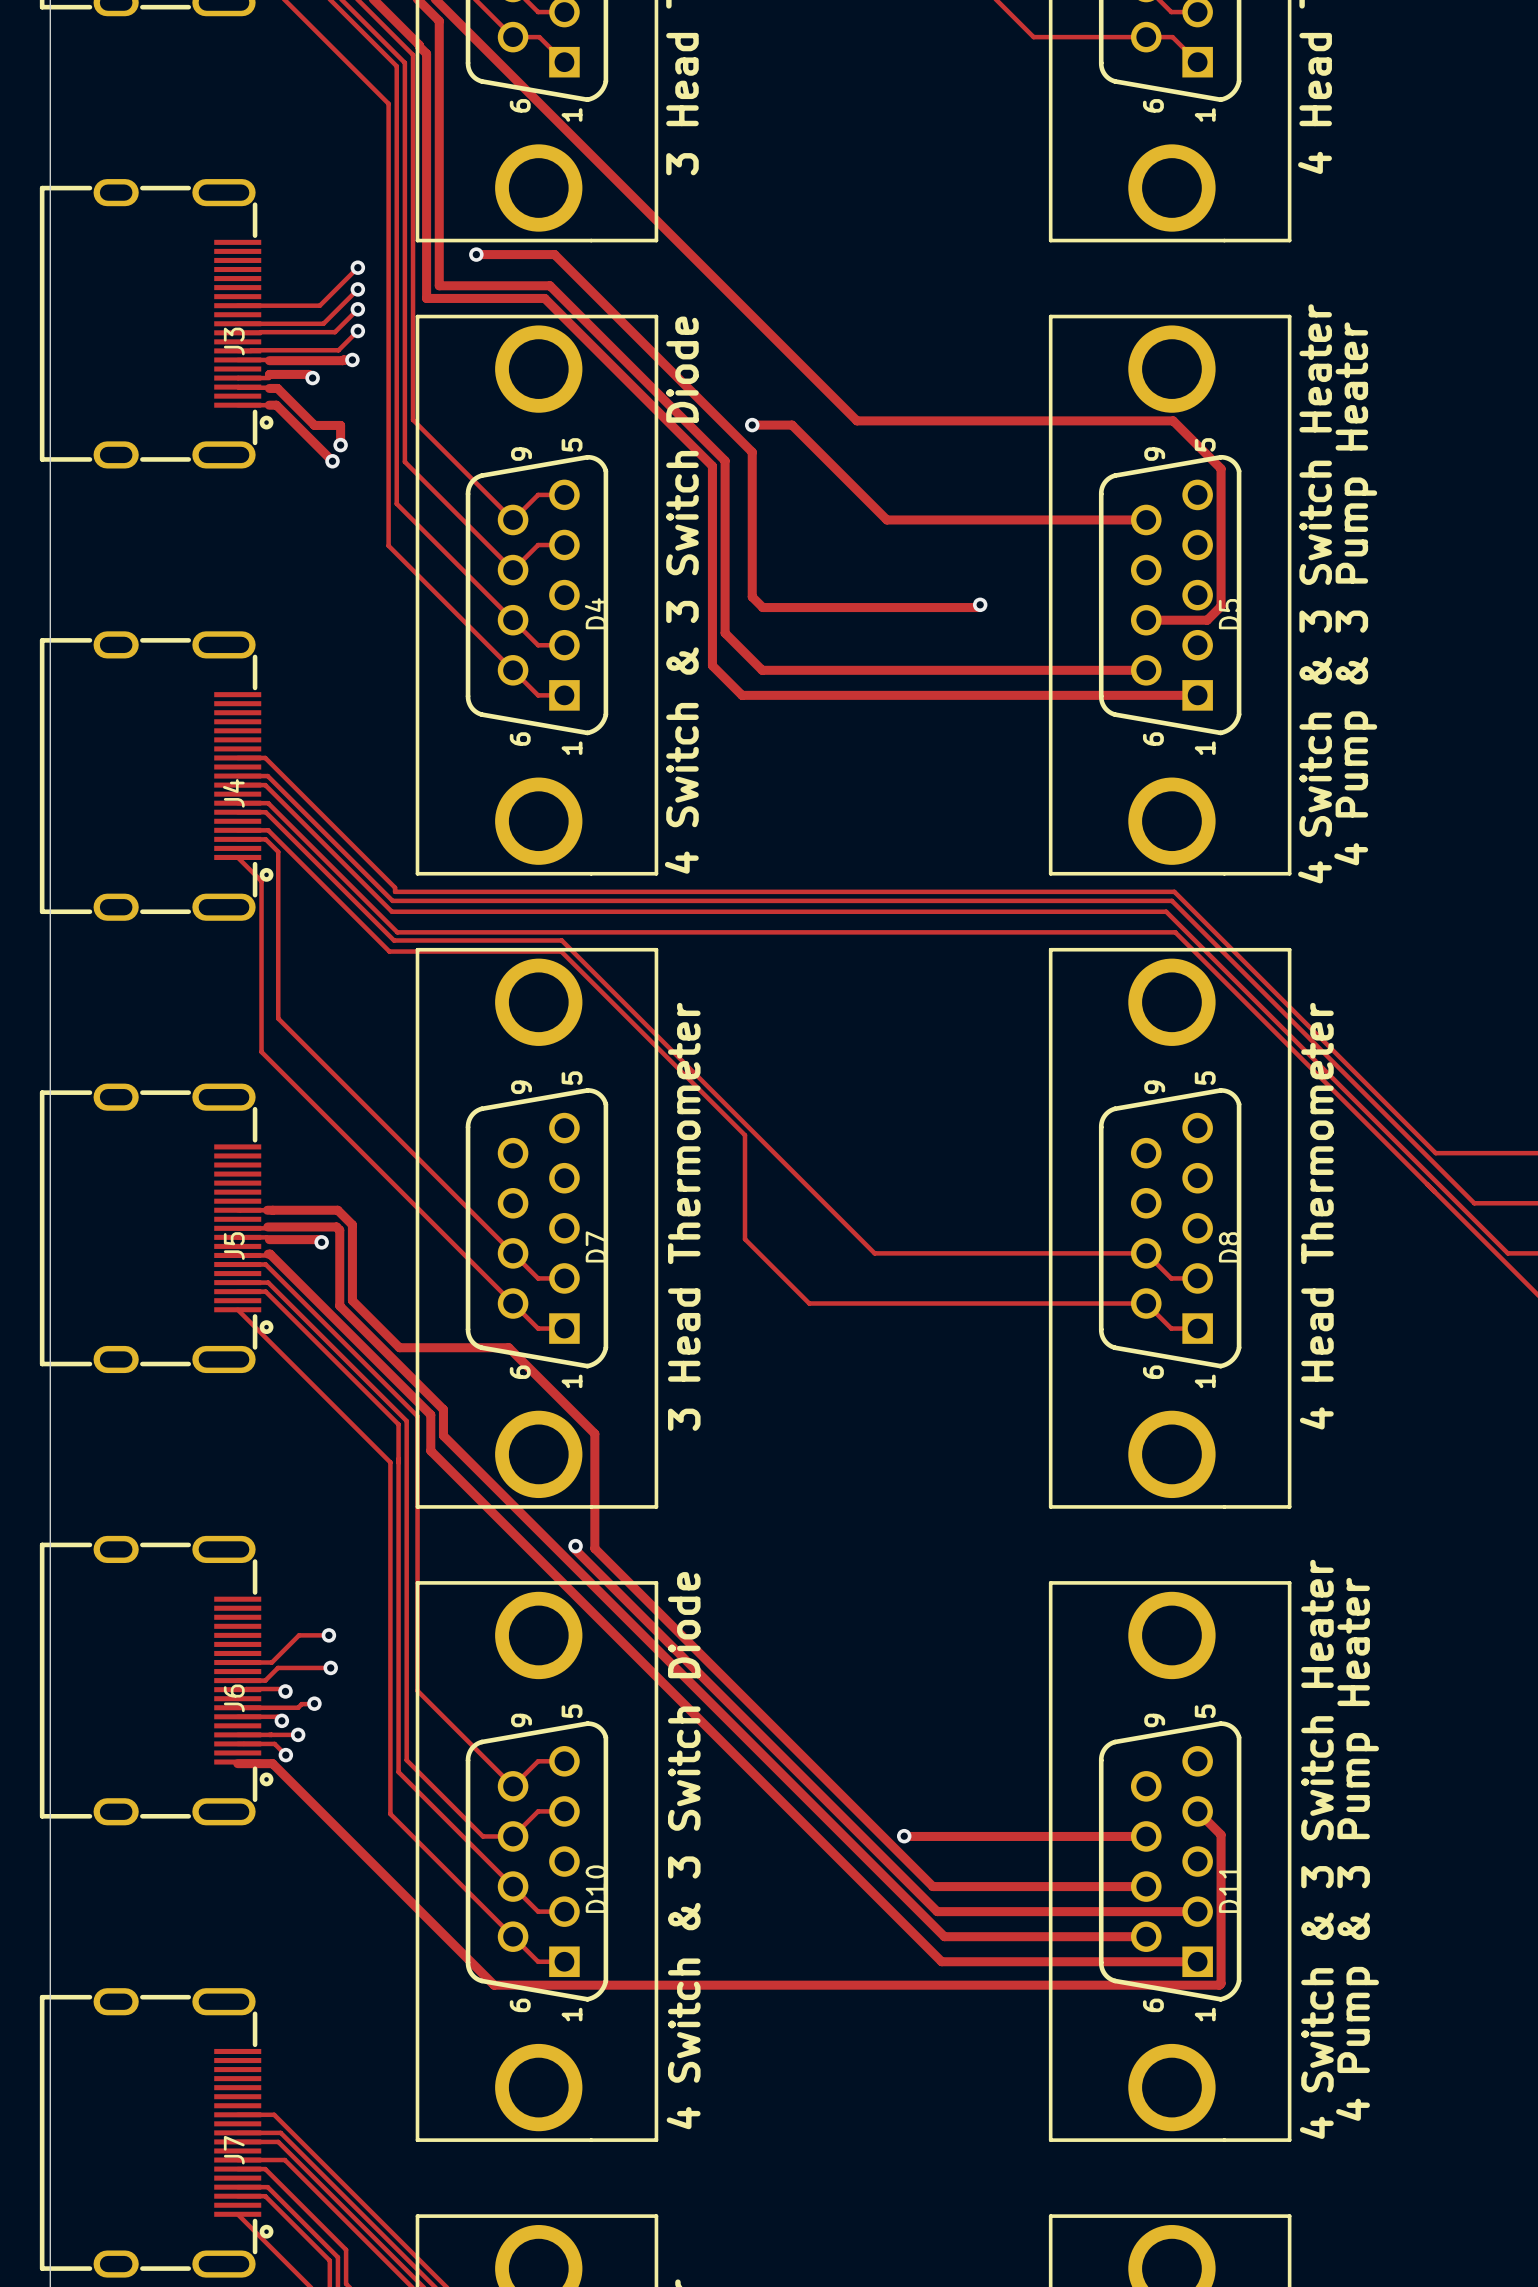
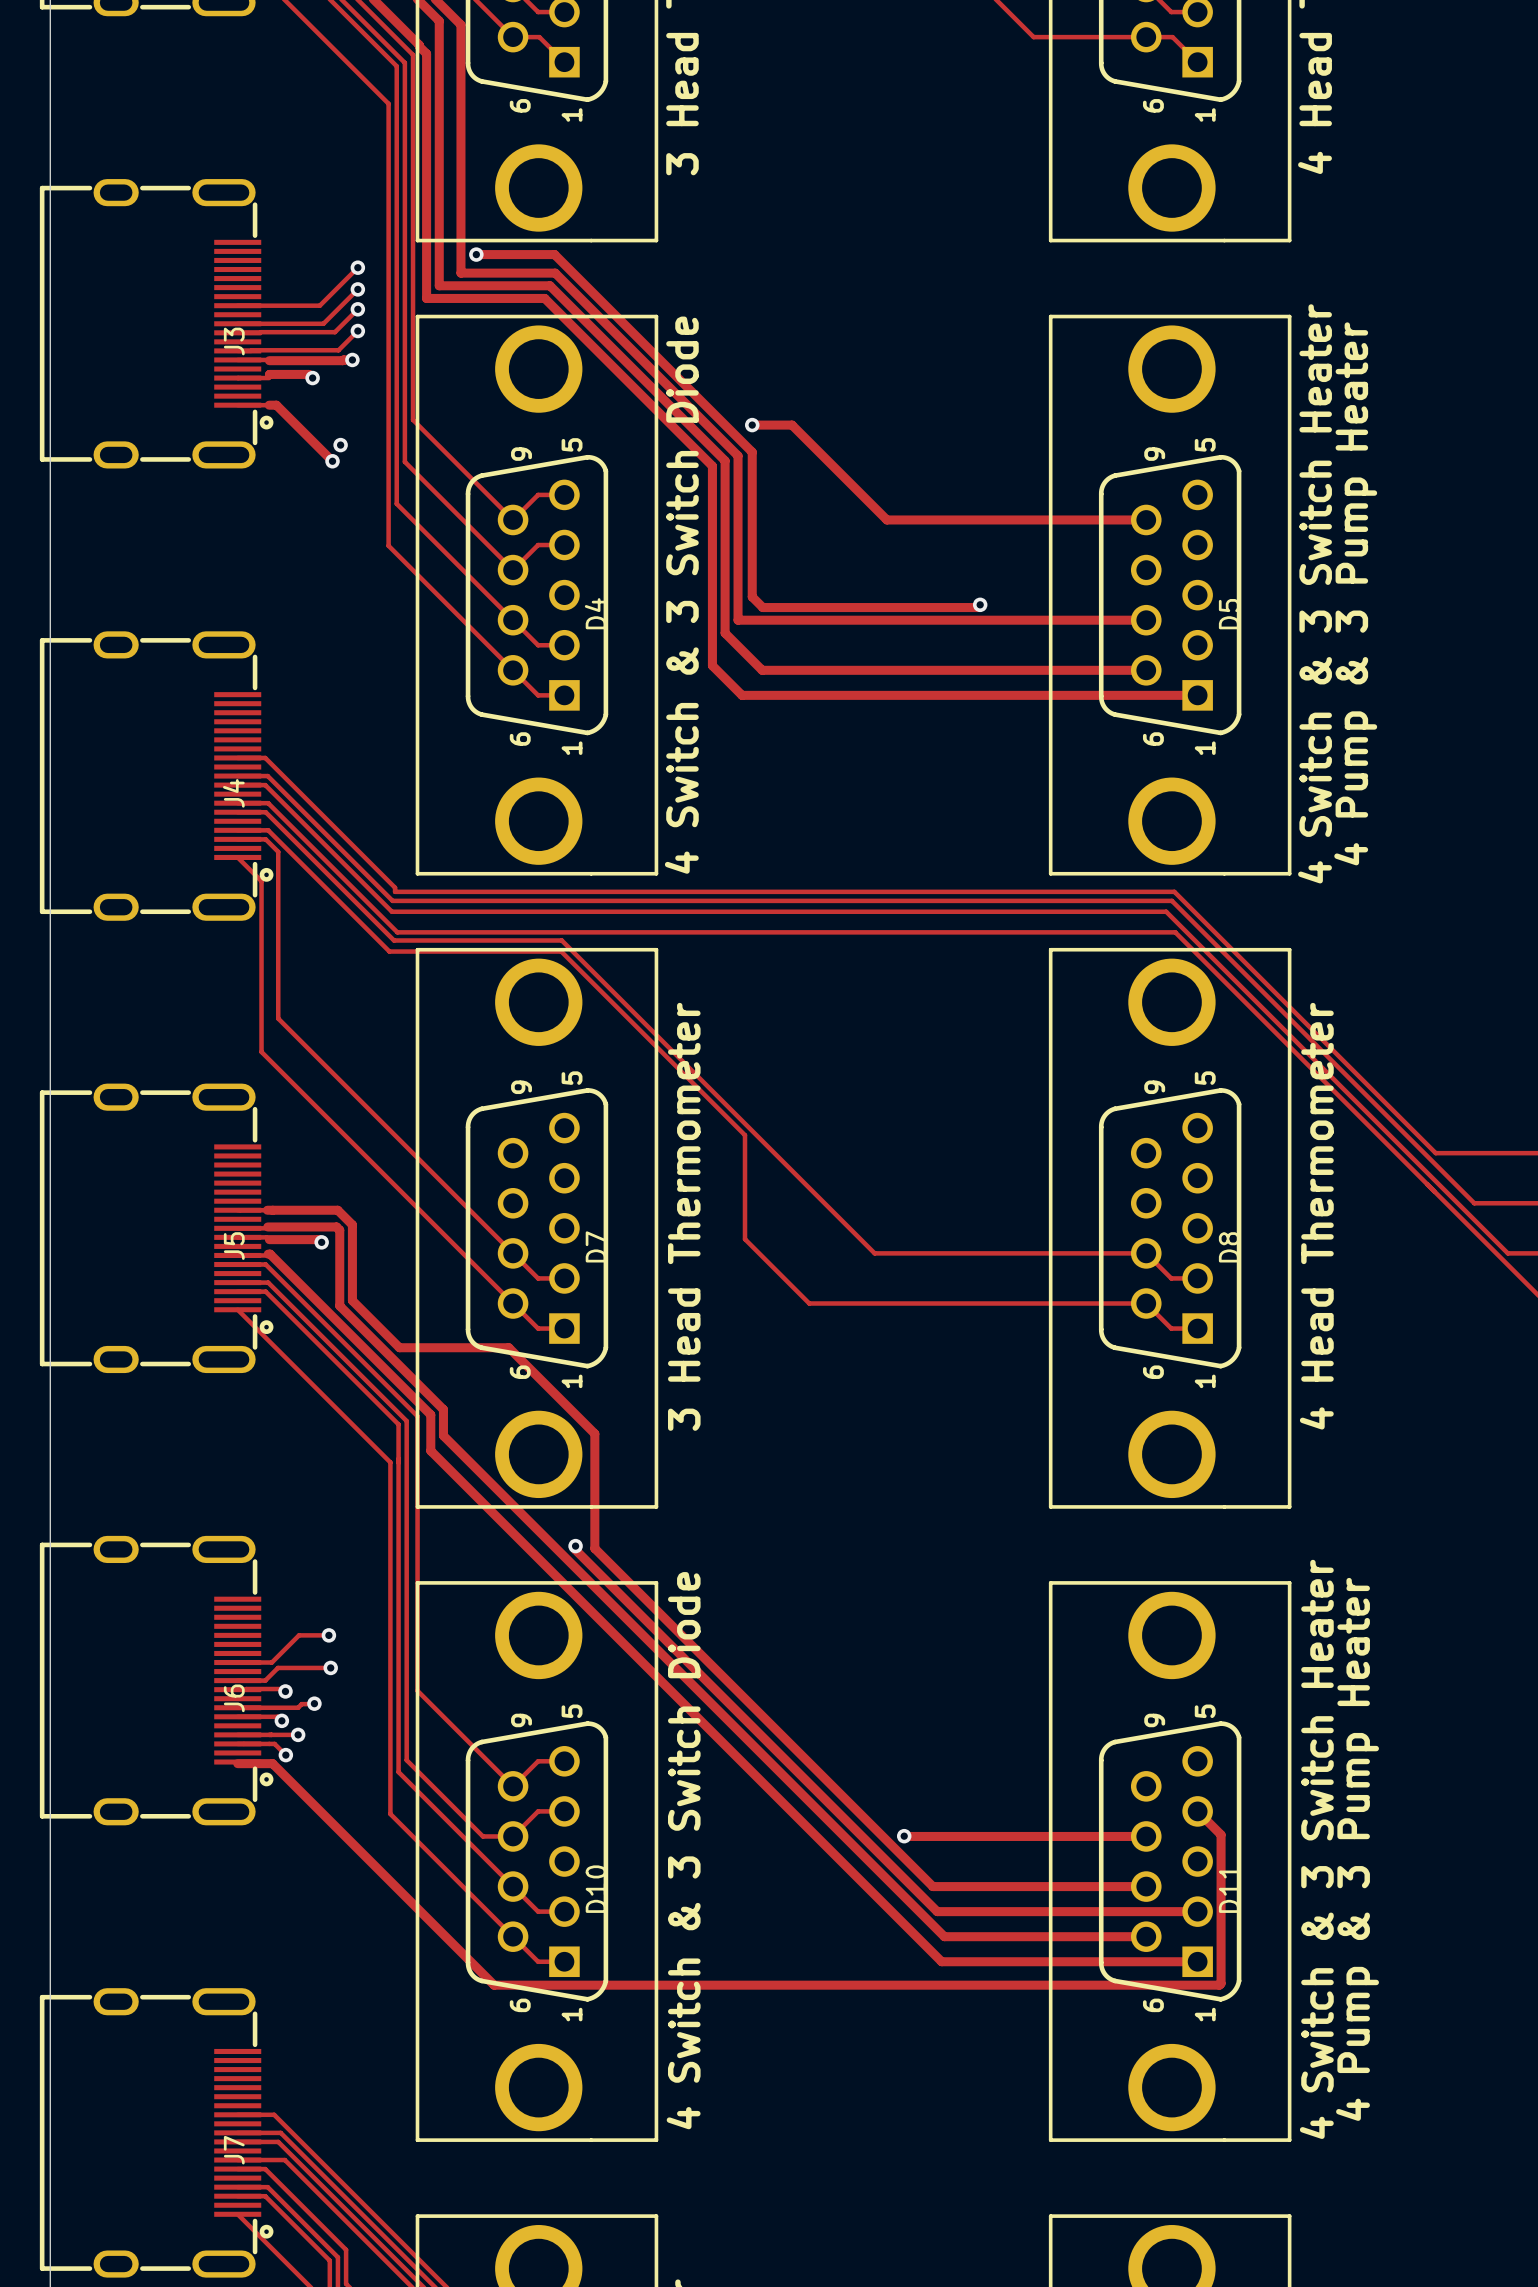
track: (460, 24) (857, 420) (1173, 420) (1221, 468) (1221, 606) (1207, 620) (1146, 620) -> (460, 24) (460, 273) (555, 273) (738, 455) (738, 620) (1146, 620)
track: (237, 387) (277, 388) (314, 425) (340, 425) (340, 445) -> none

